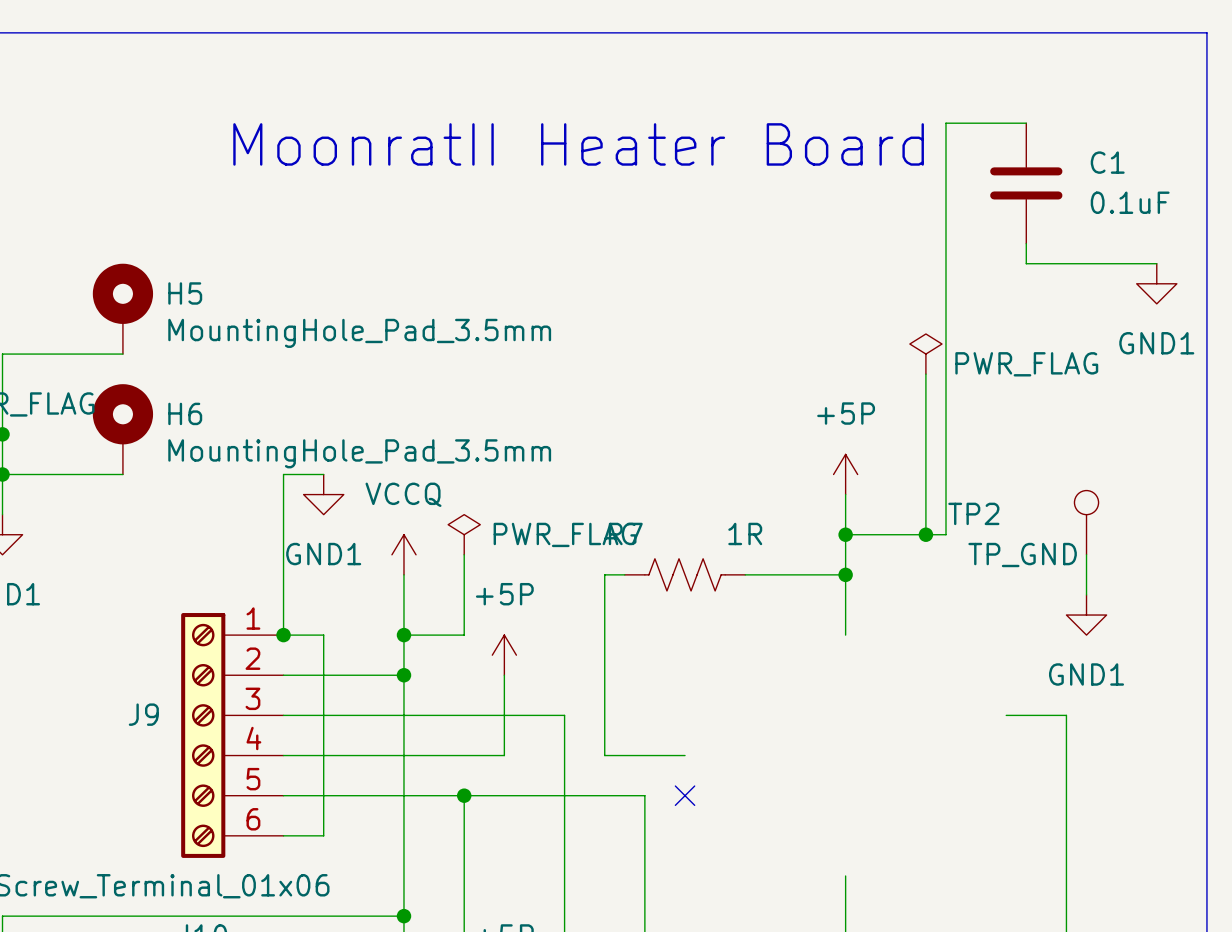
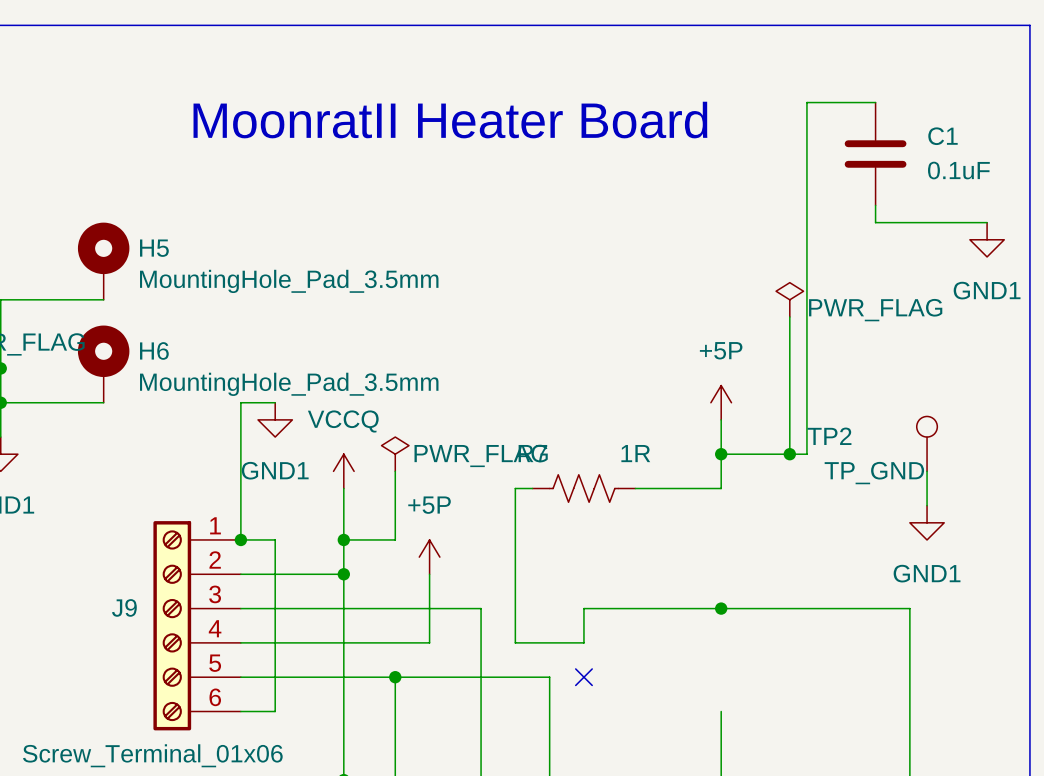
wire: (845, 574) (845, 635) -> none
junction: (845, 574) -> none
junction: none -> (721, 608)
wire: none -> (858, 608) (583, 608) (583, 642)
wire: none -> (721, 711) (721, 745)

